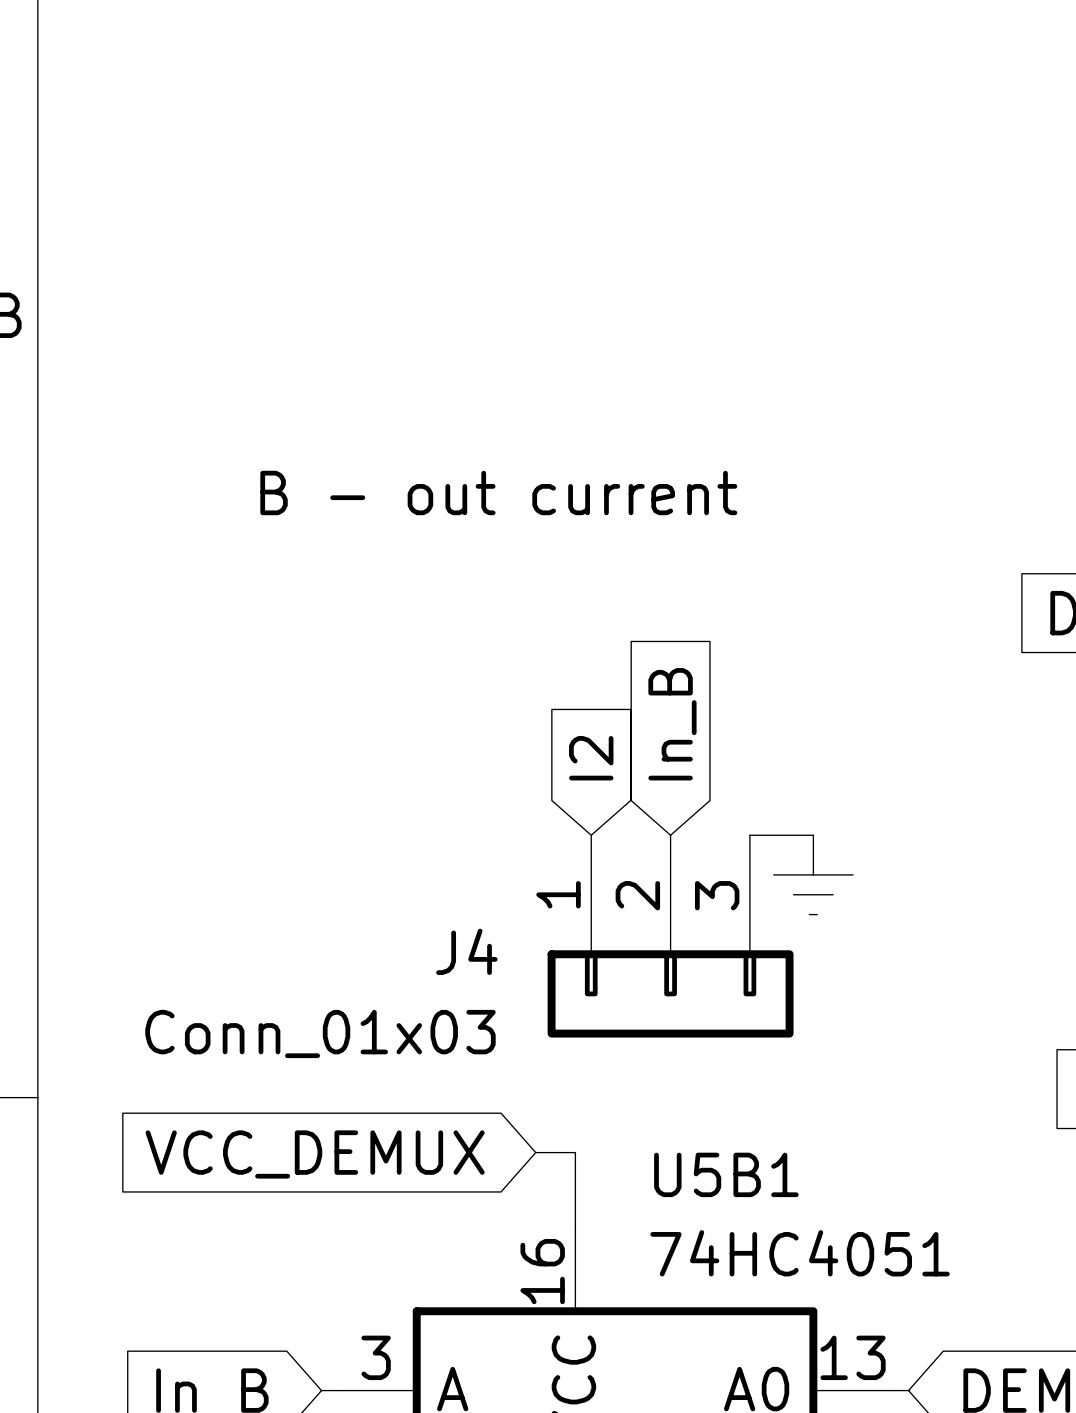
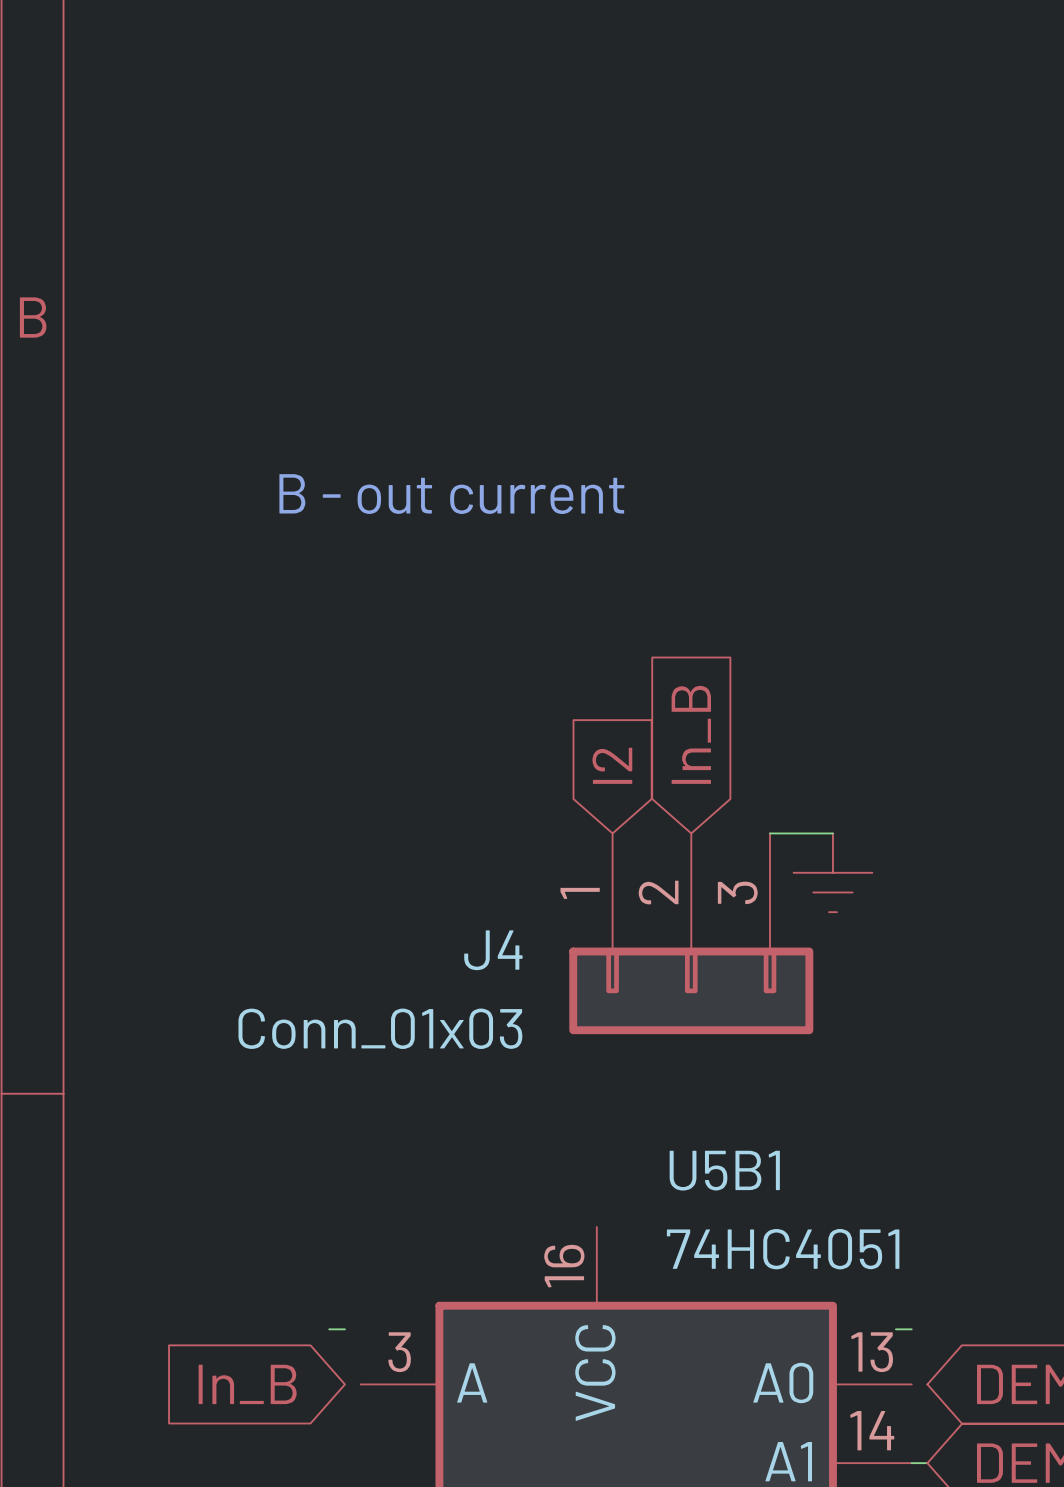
wire: (535, 1152) (575, 1152) (575, 1231) -> none
global label: VCC_DEMUX (315, 1154) -> none
wire: (321, 1390) (337, 1390) -> (329, 1329) (344, 1329)
wire: (892, 1390) (908, 1390) -> (895, 1329) (911, 1329)

